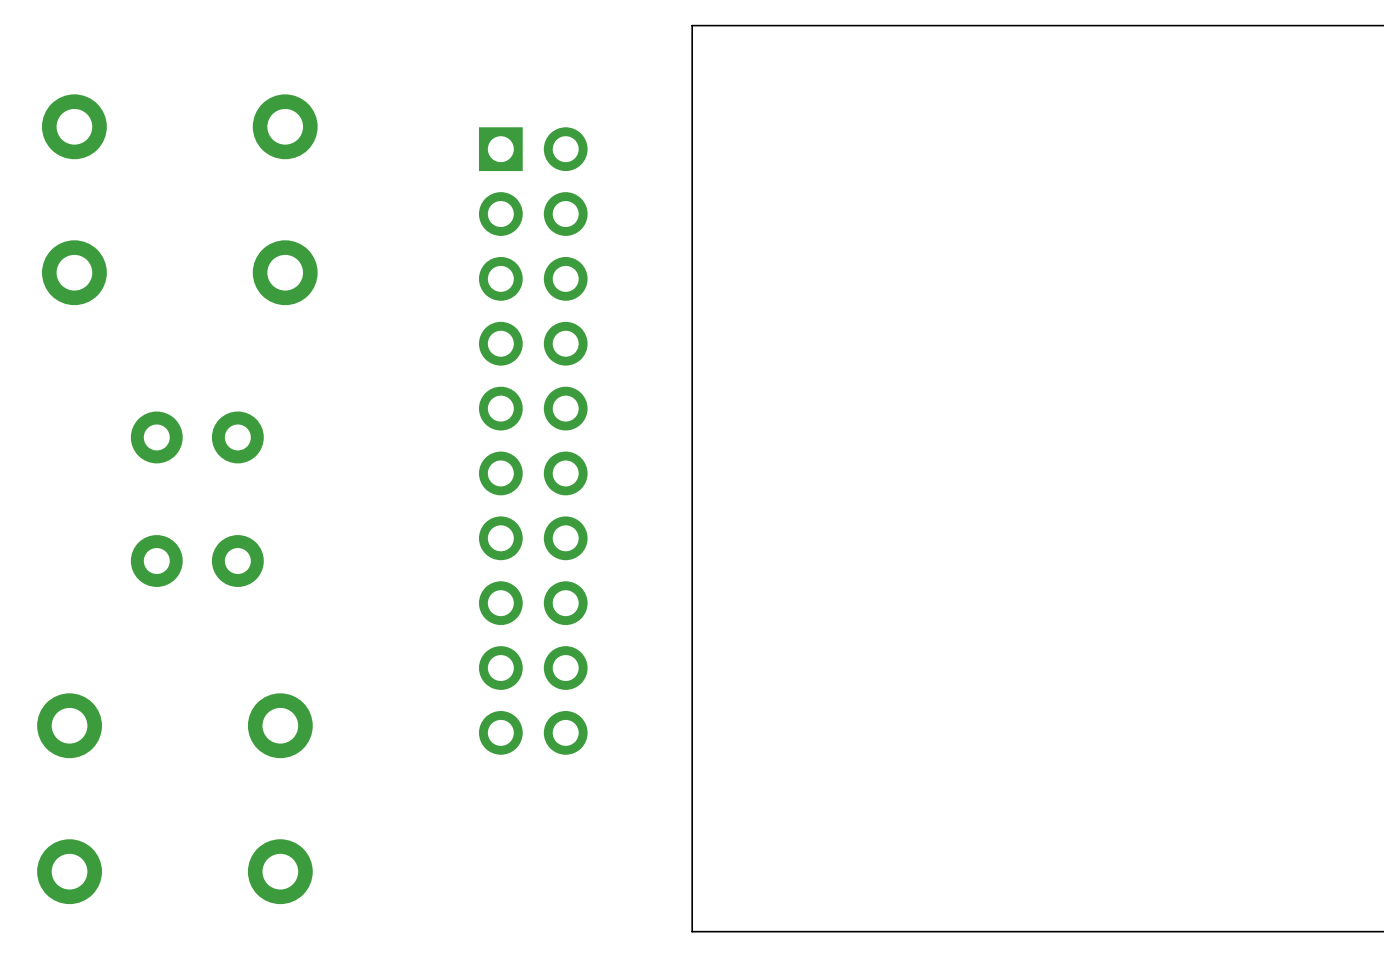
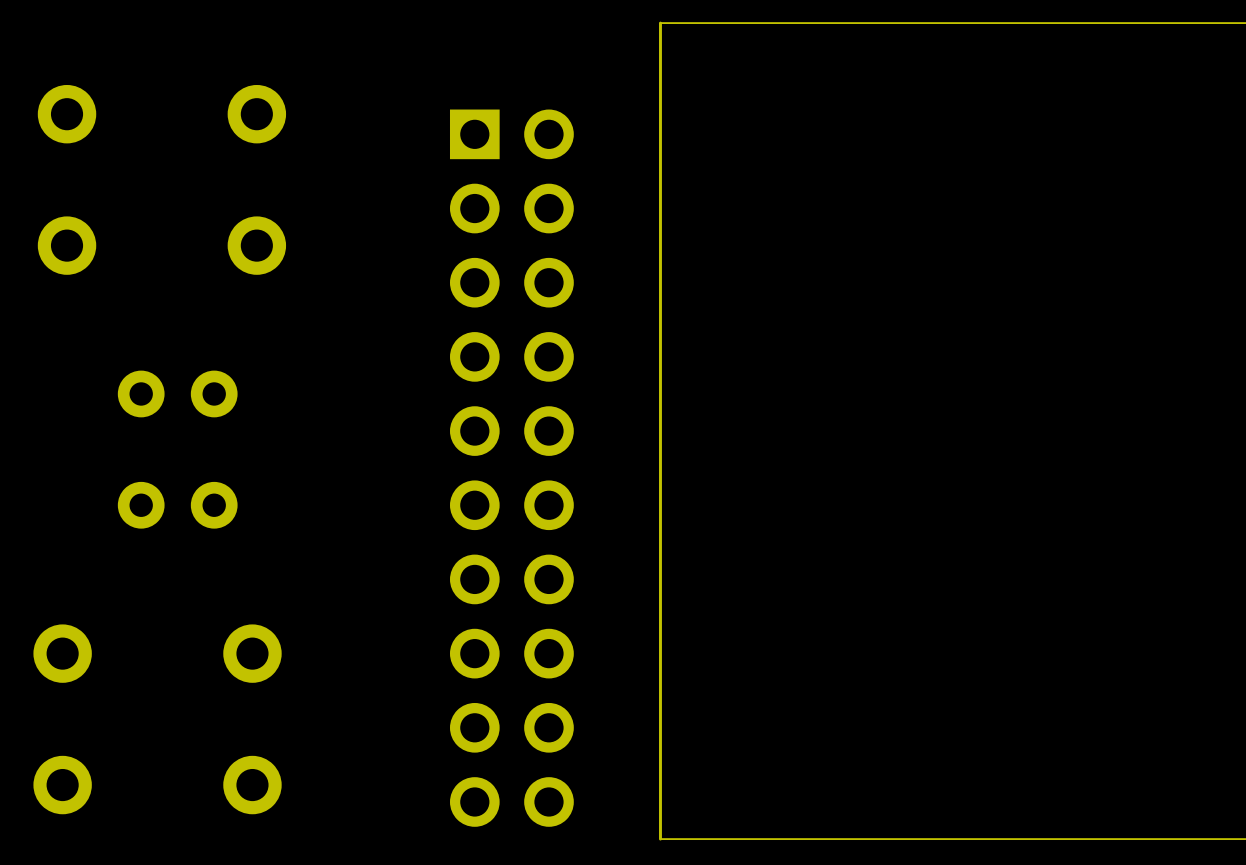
board edge: (733, 25) (692, 25) (692, 931) (733, 931) -> (660, 23) (660, 839)
part: (533, 441) -> none
part: none -> (511, 468)

